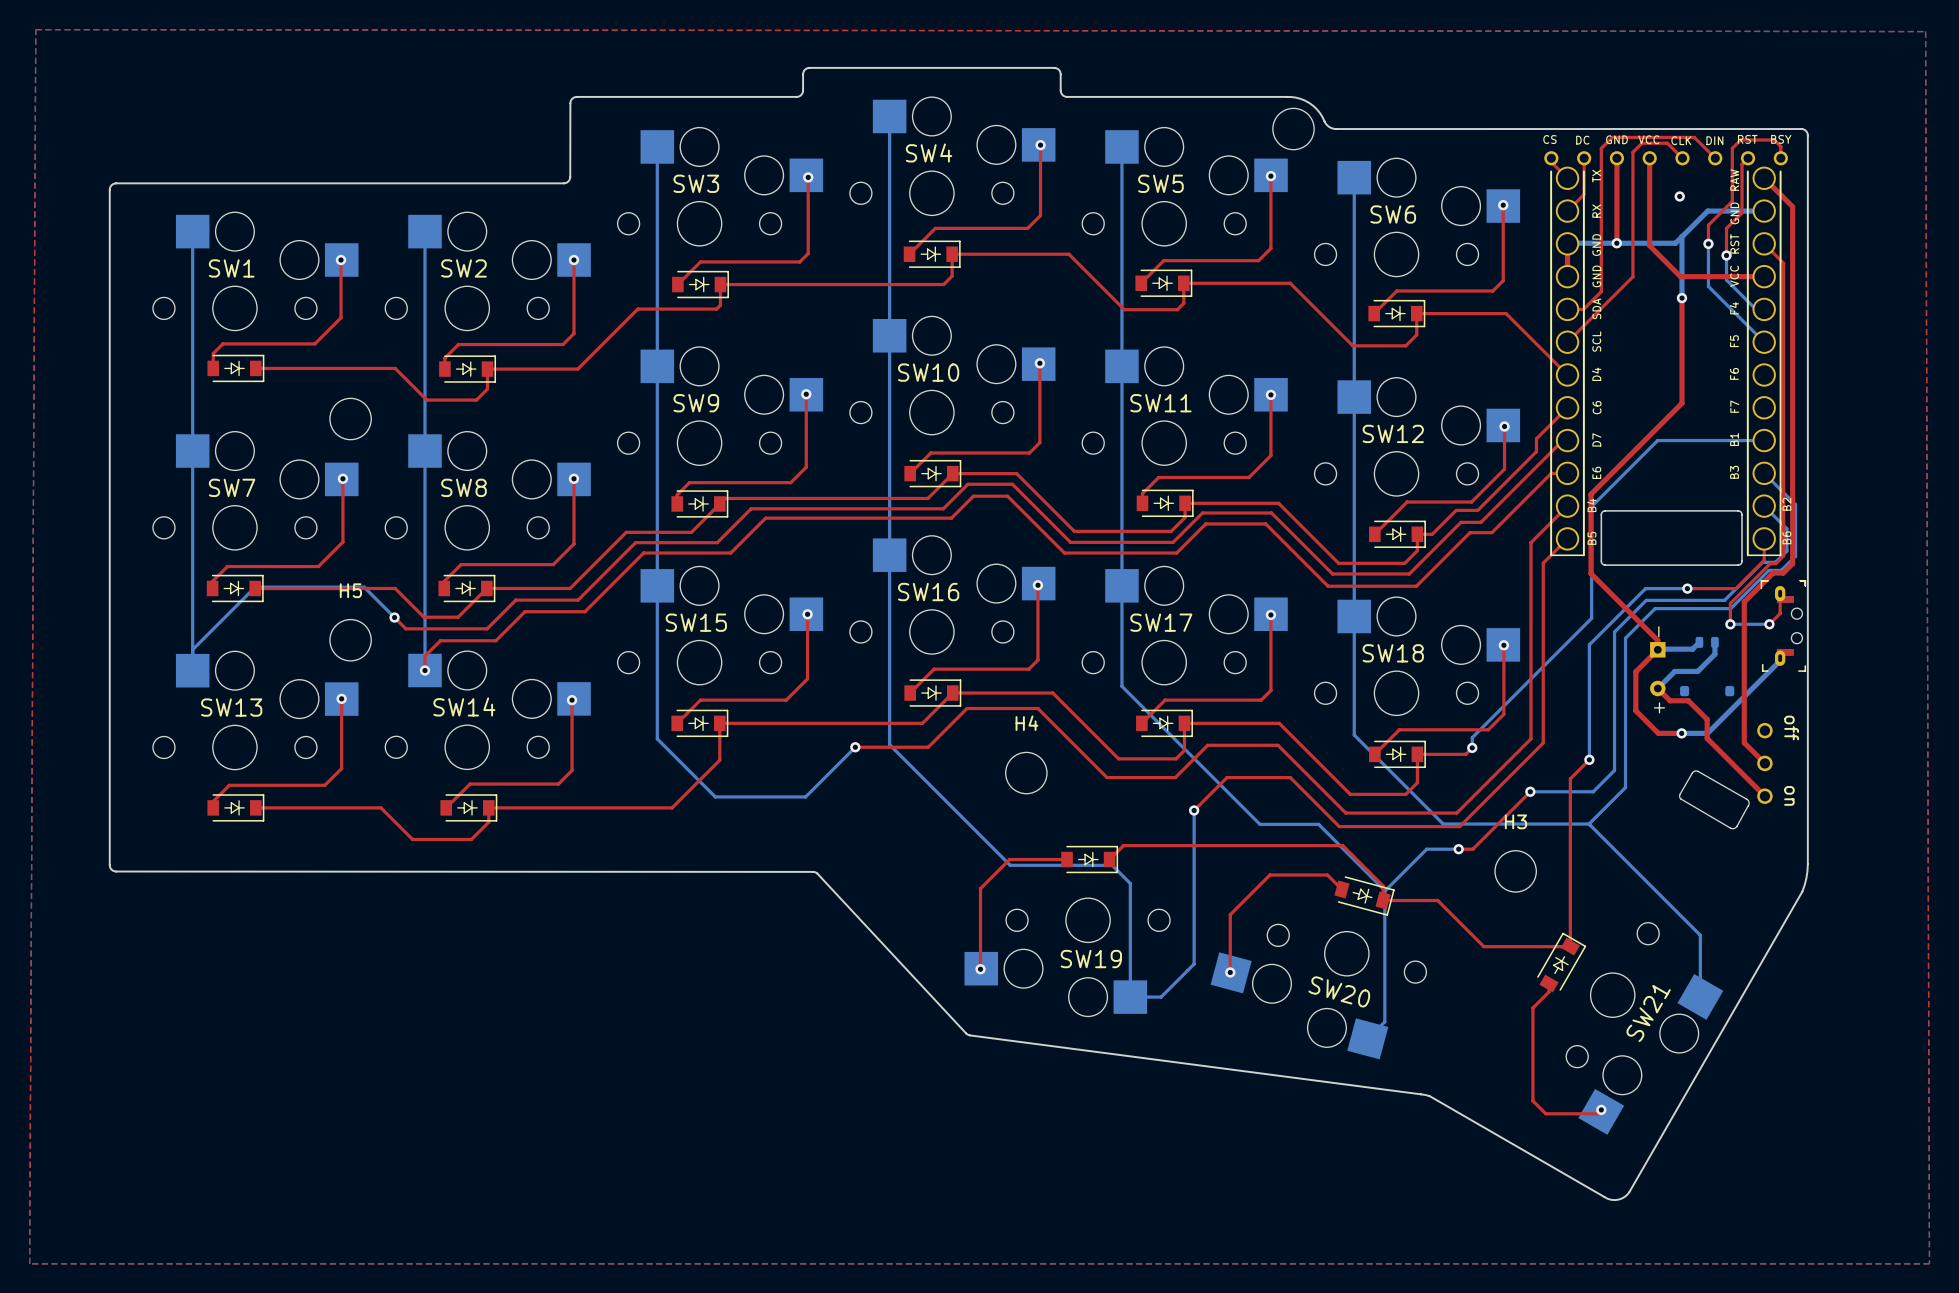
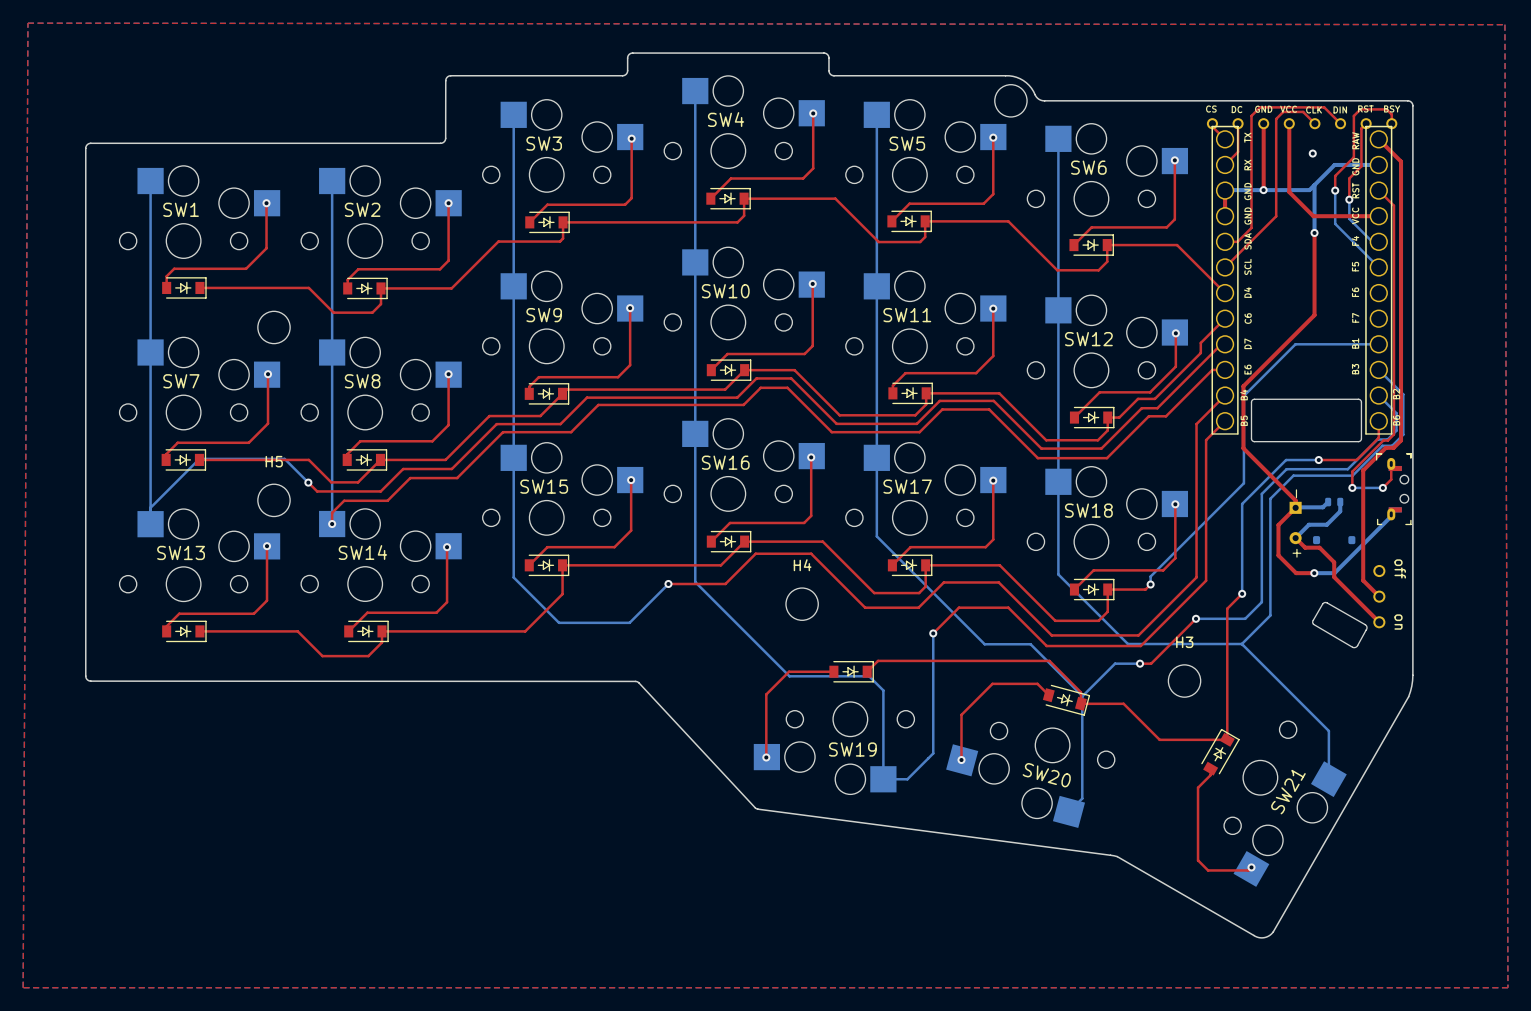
part footprint: [1550, 166, 1782, 566] -> [1211, 125, 1393, 443]

